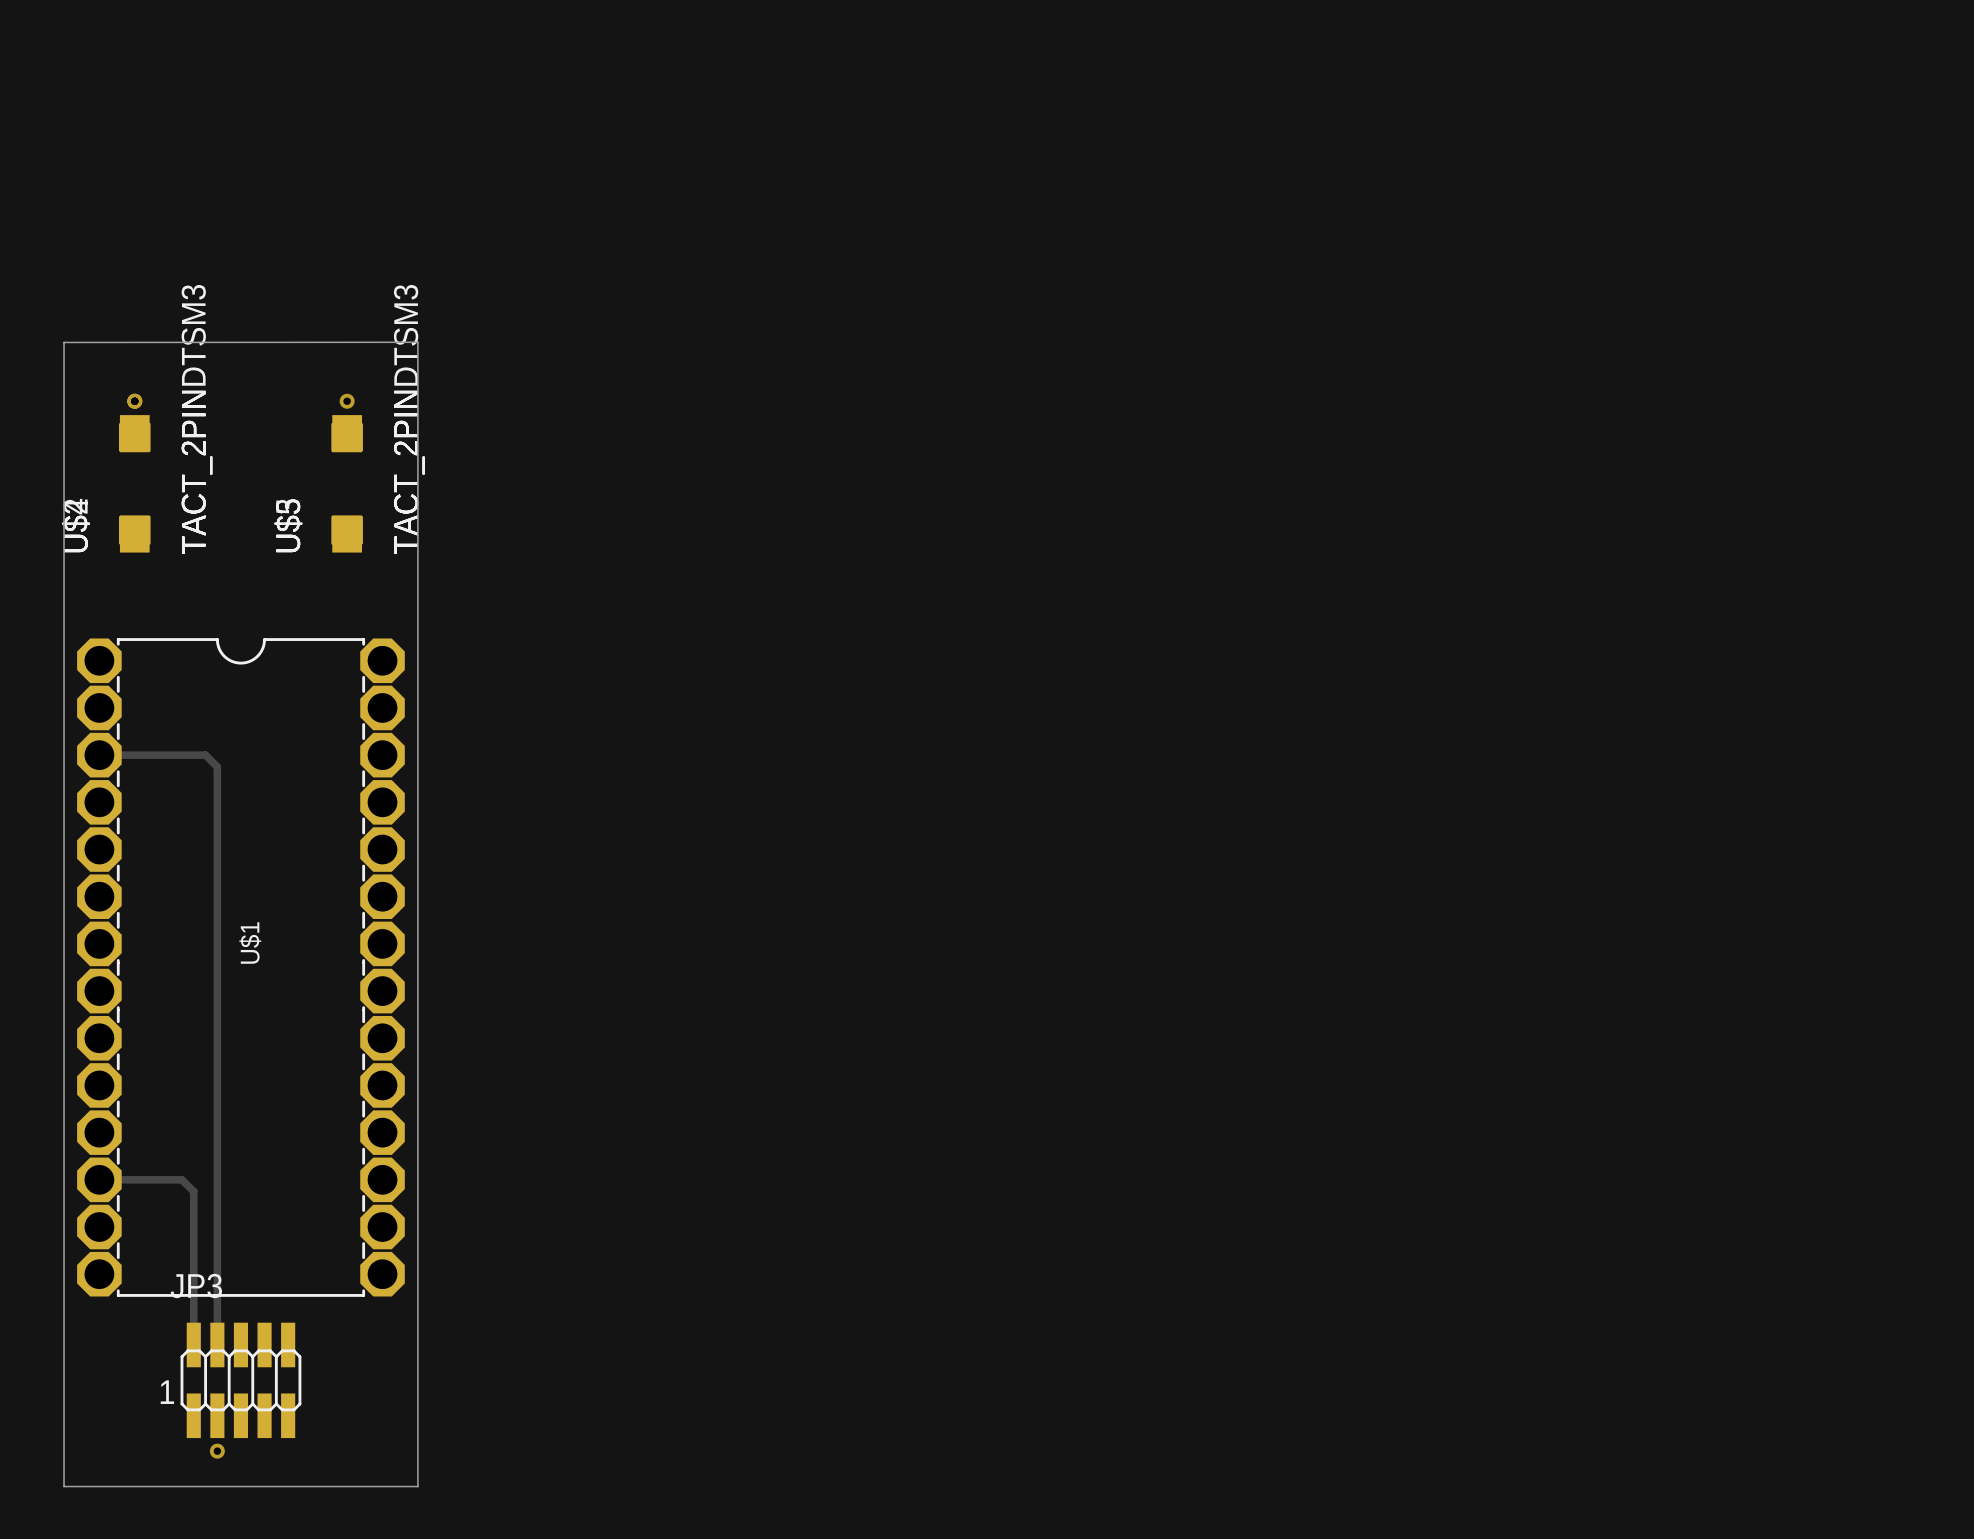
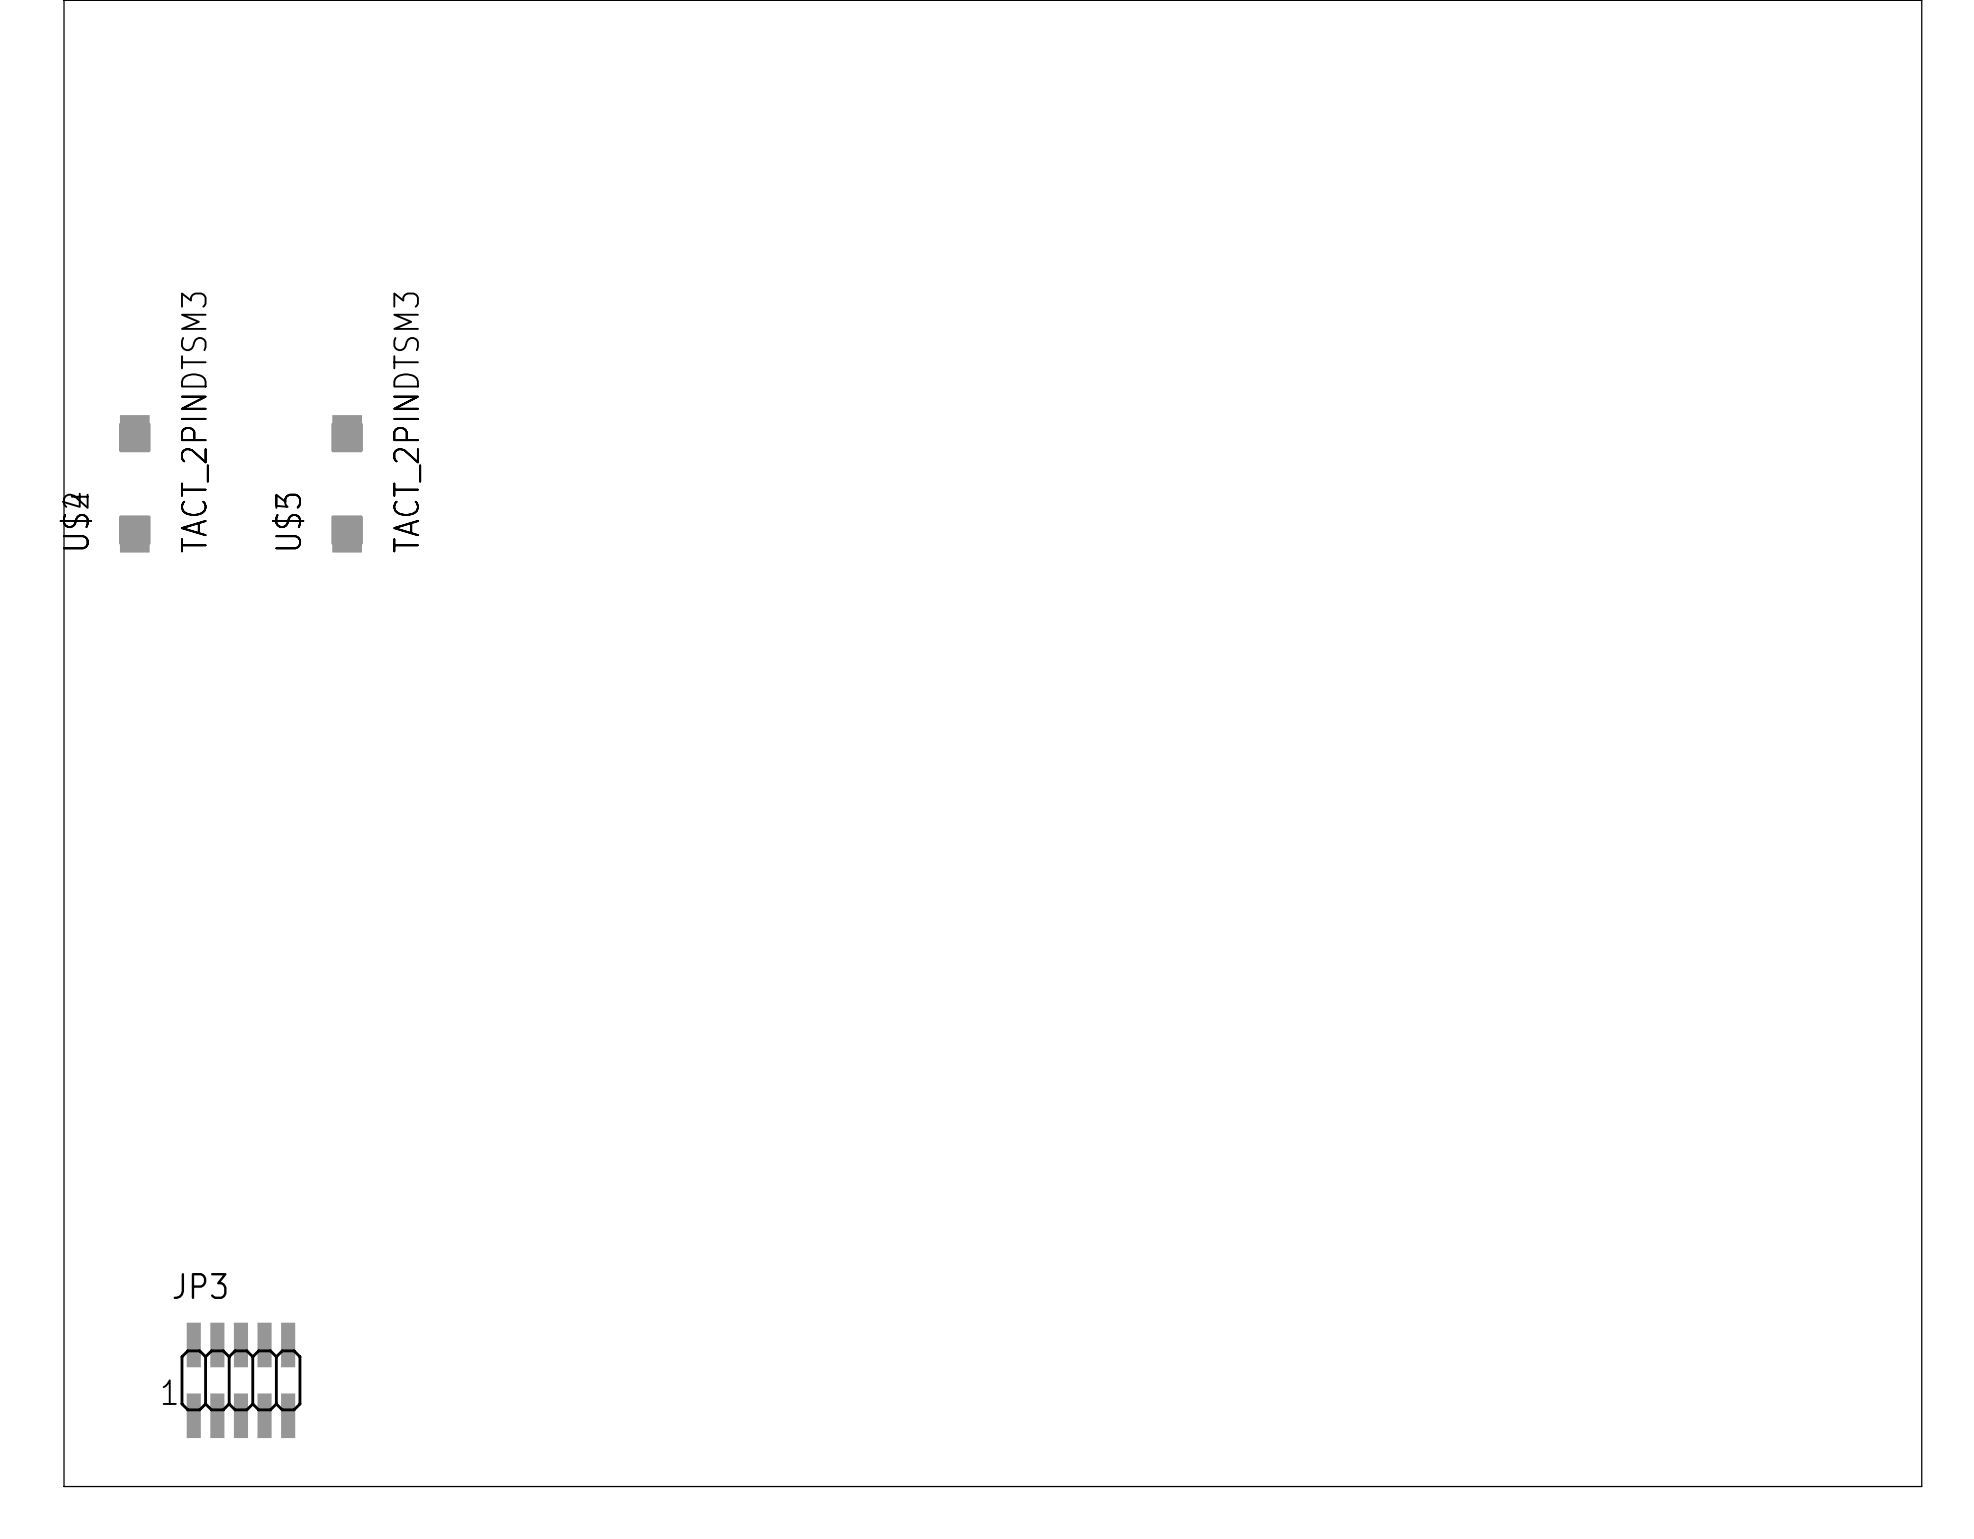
board edge: (64, 342) (417, 342) (417, 1486) -> (64, 342) (64, 0) (1921, 0) (1921, 1486) (417, 1486)
via: (134, 401) -> none
via: (347, 401) -> none
track: (99, 755) (205, 755) (217, 766) (217, 1344) -> none
U$1: (240, 967) -> none
track: (99, 1179) (181, 1179) (193, 1191) (193, 1344) -> none
via: (217, 1451) -> none

